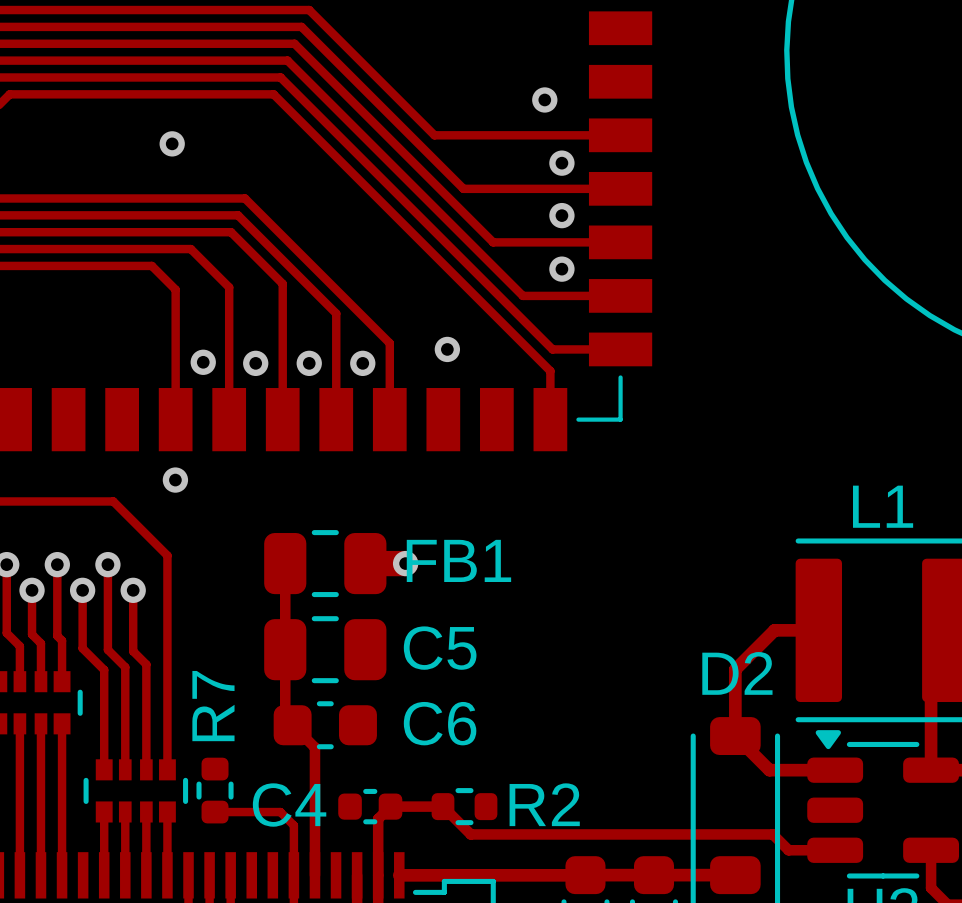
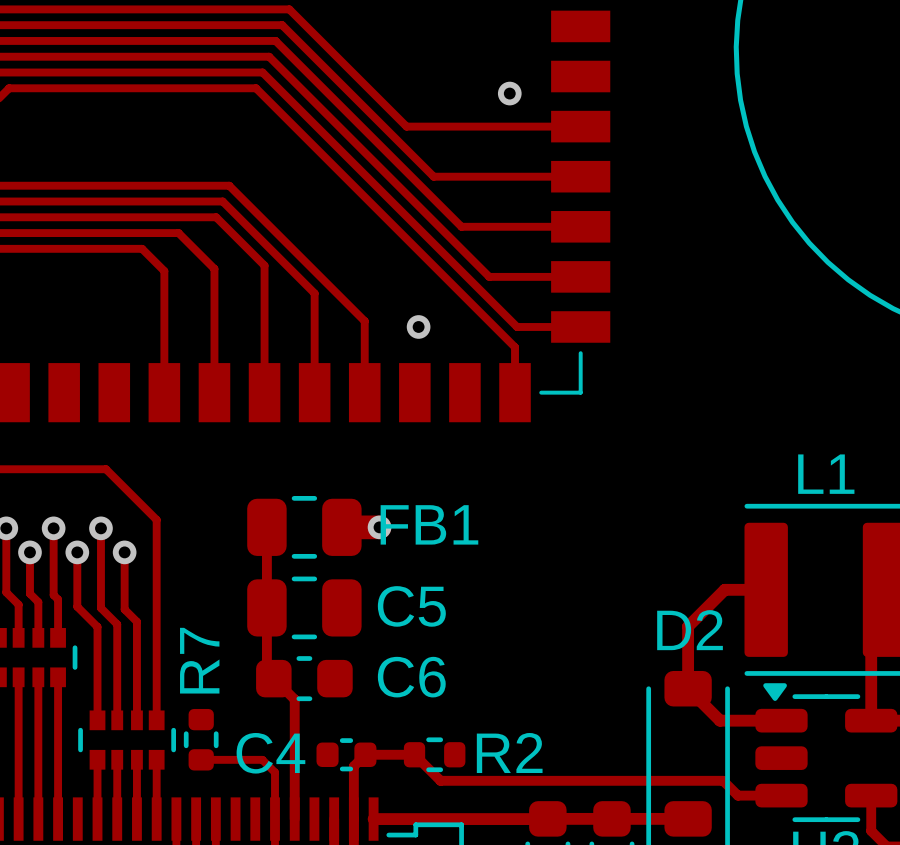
via: (172, 143) -> none
via: (561, 163) -> none
via: (561, 215) -> none
via: (561, 269) -> none
via: (203, 362) -> none
via: (255, 363) -> none
via: (309, 363) -> none
via: (362, 363) -> none
via: (175, 480) -> none

